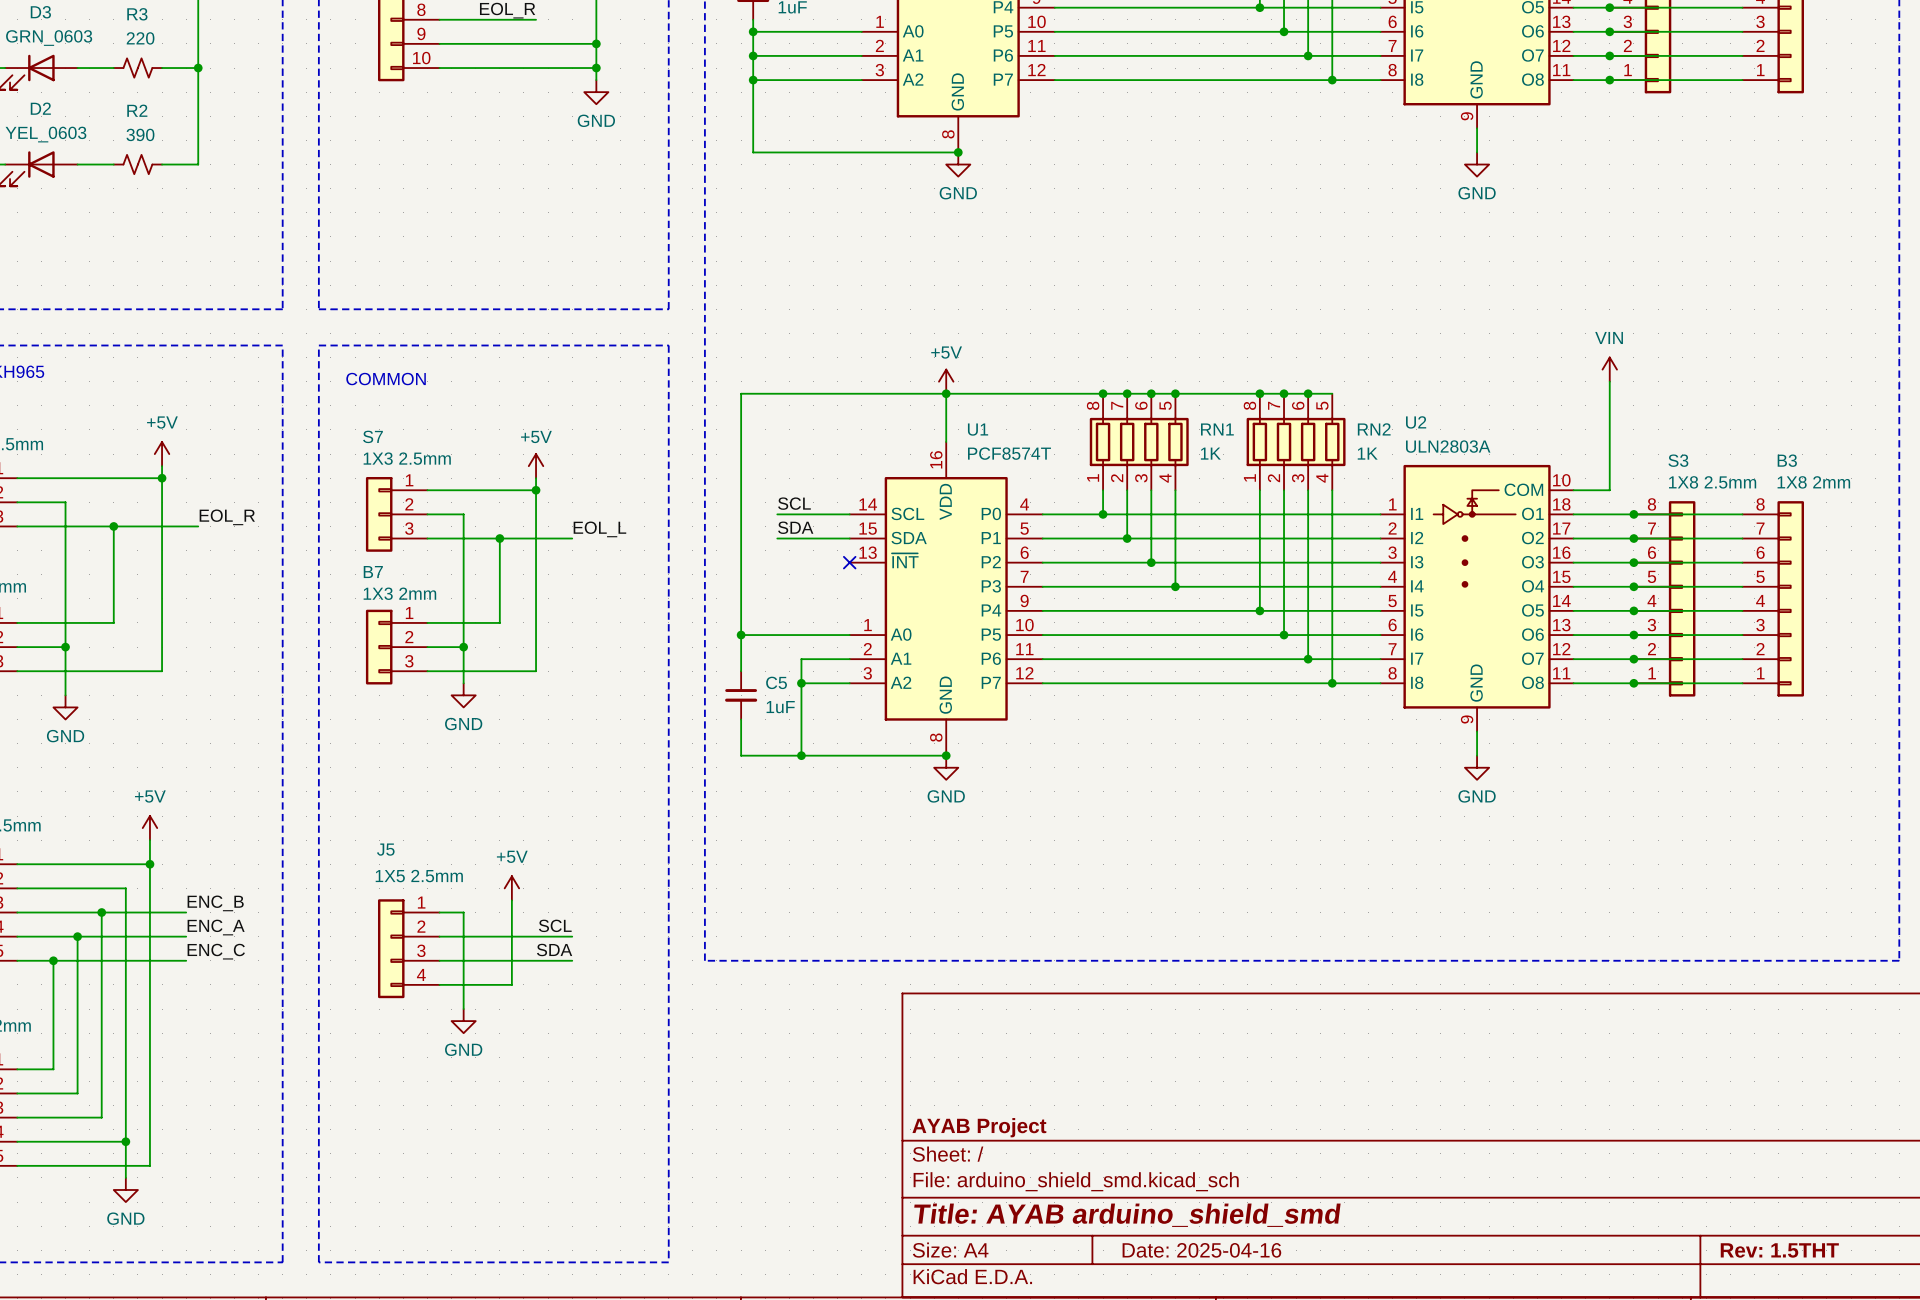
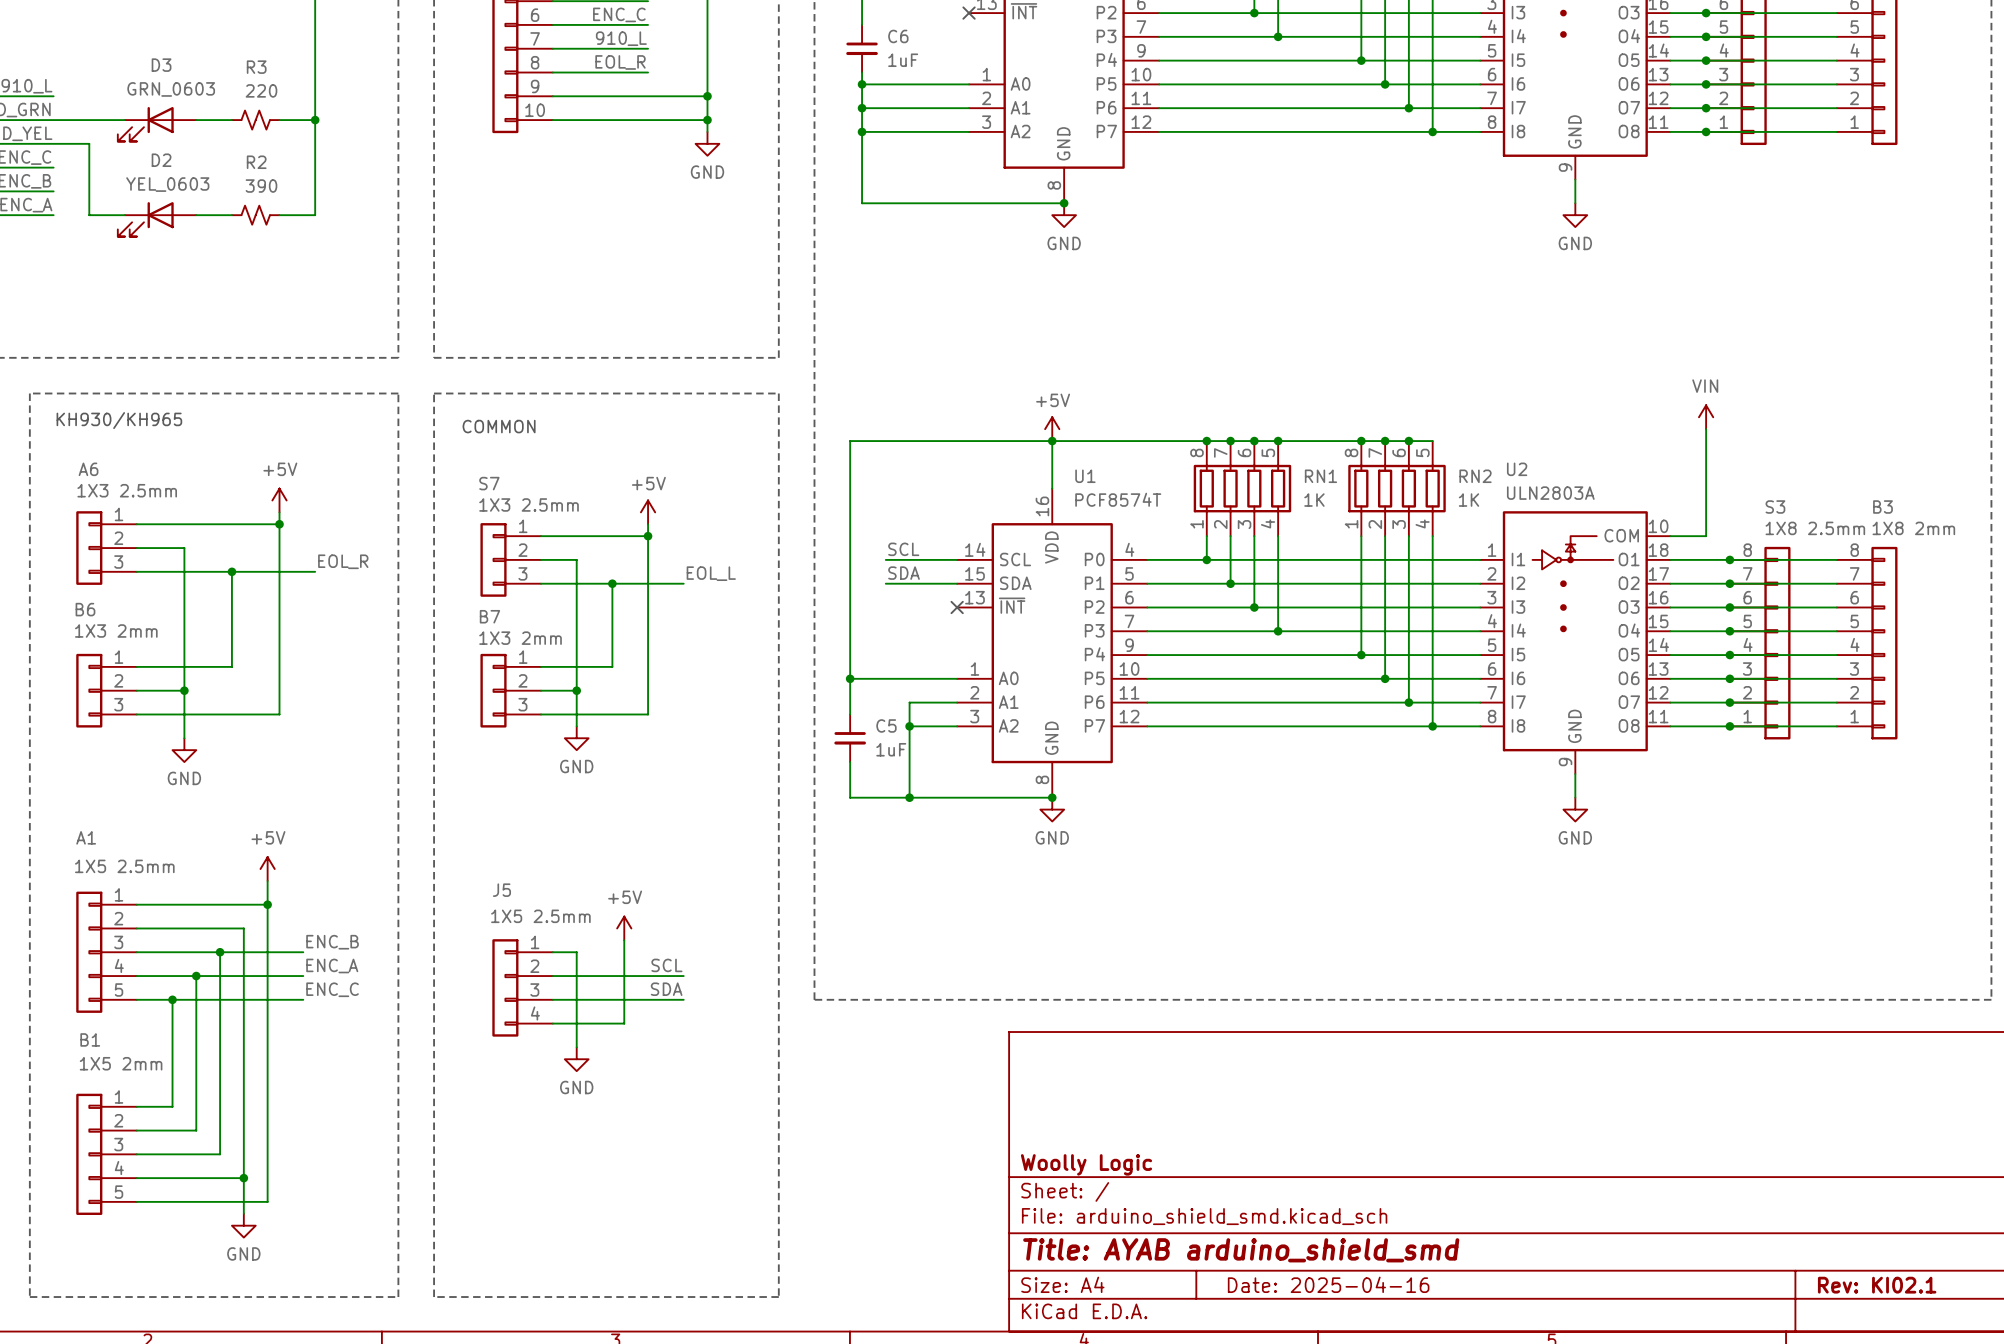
title block: AYAB Project (979, 1127) -> Woolly Logic (1086, 1164)
title block: Rev: 1.5THT (1779, 1250) -> Rev: KI02.1 (1877, 1285)

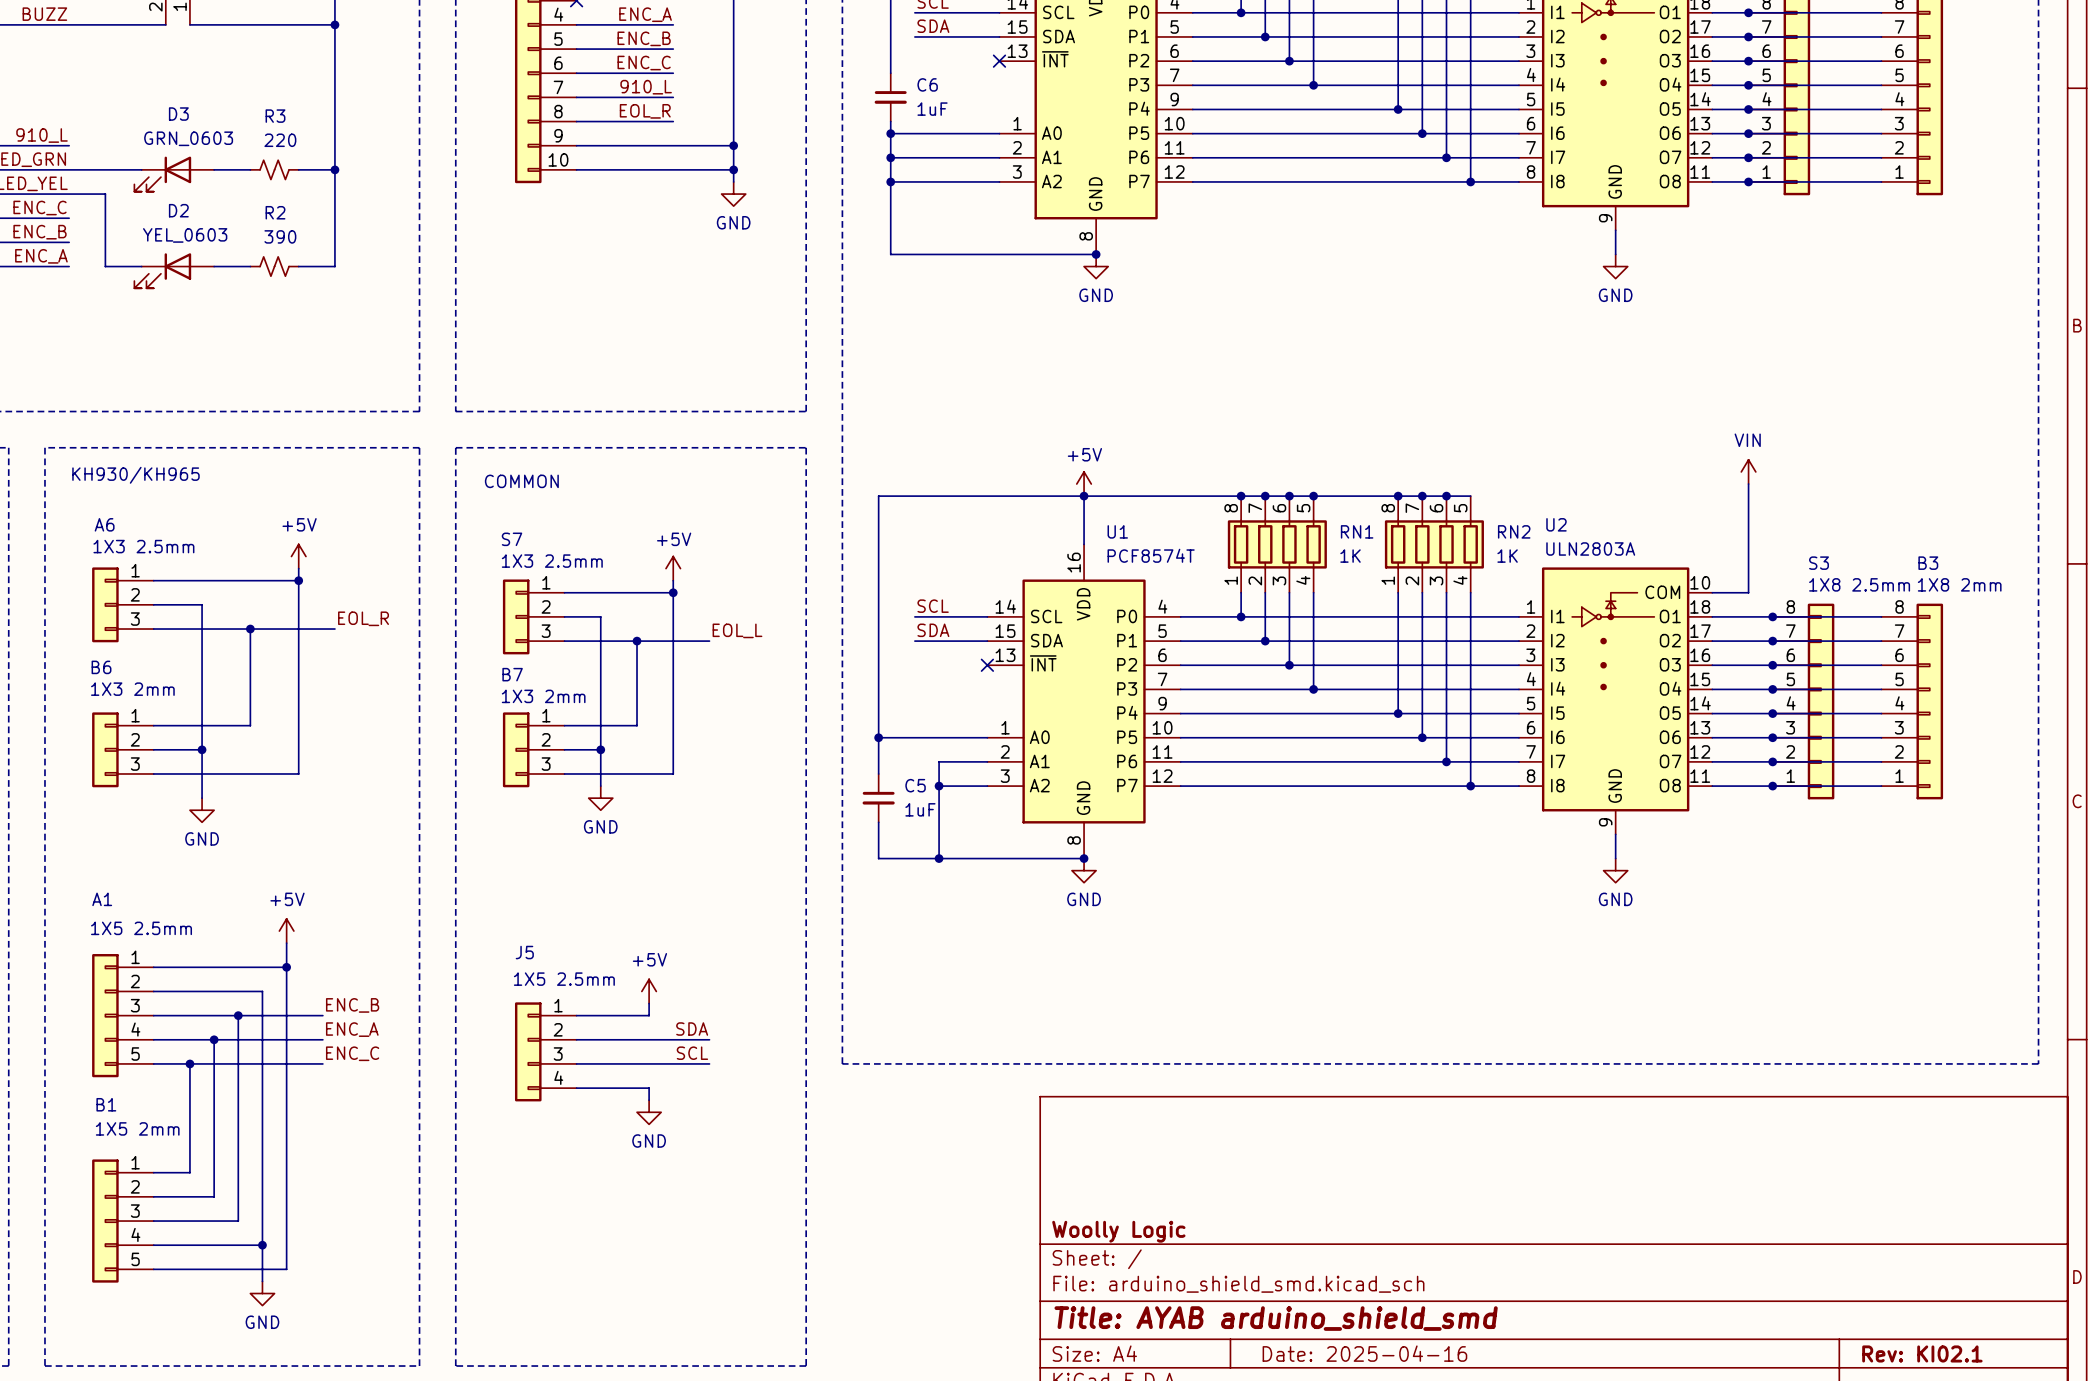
wire: (576, 952) (576, 1047) -> (600, 1015) (649, 1015)
wire: (624, 952) (624, 1023) -> (649, 1100) (649, 1088)
label: SCL (666, 965) -> SDA (692, 1029)
label: SDA (666, 989) -> SCL (692, 1053)
power symbol position: GND (576, 1059) -> GND (649, 1112)

